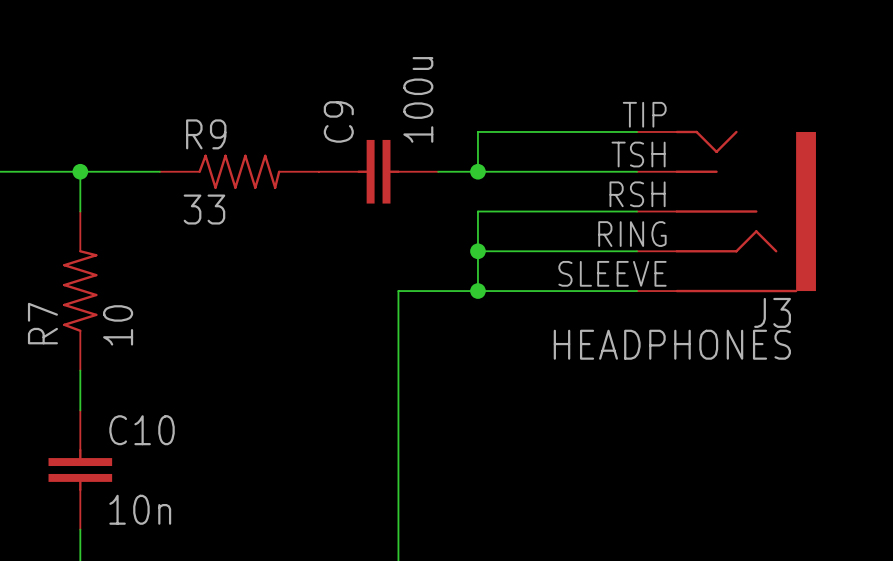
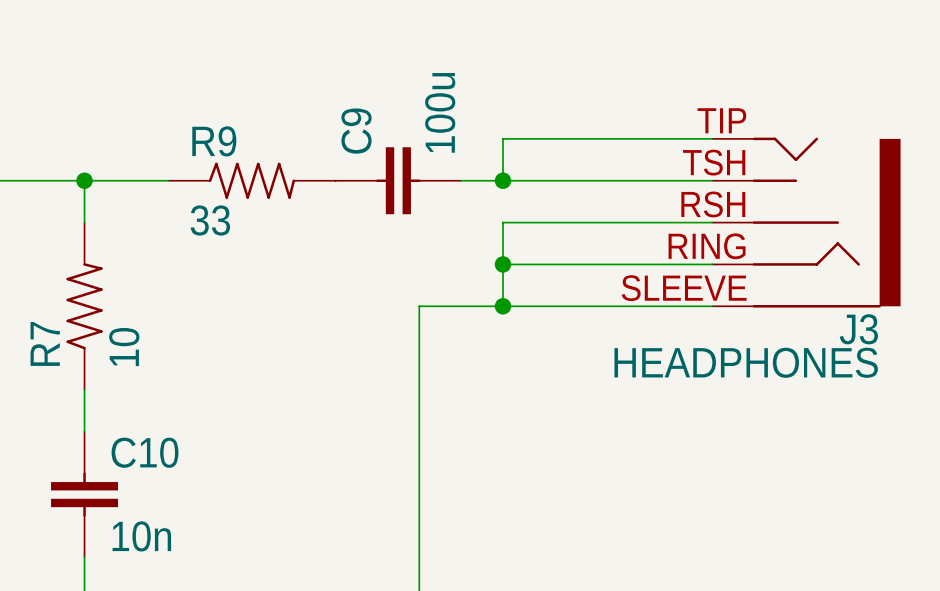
J3 position: (726, 211) -> (806, 222)

